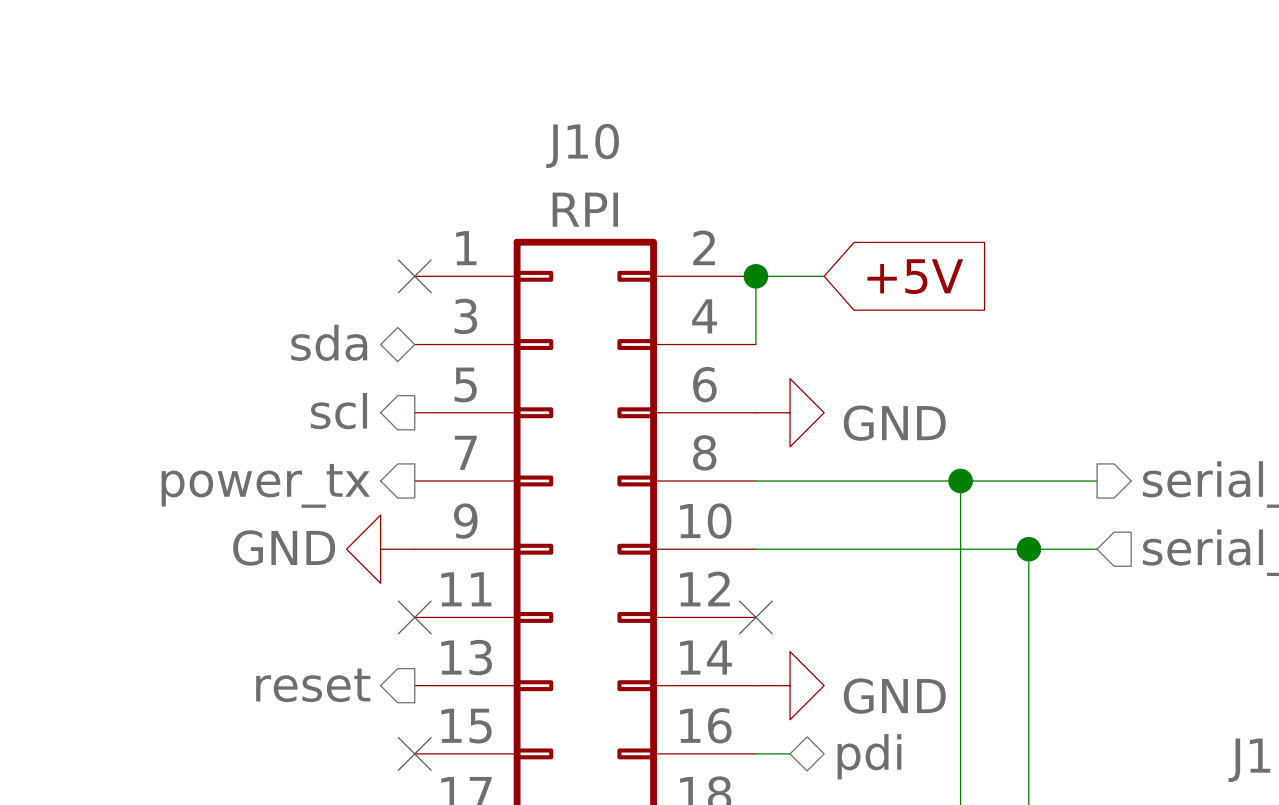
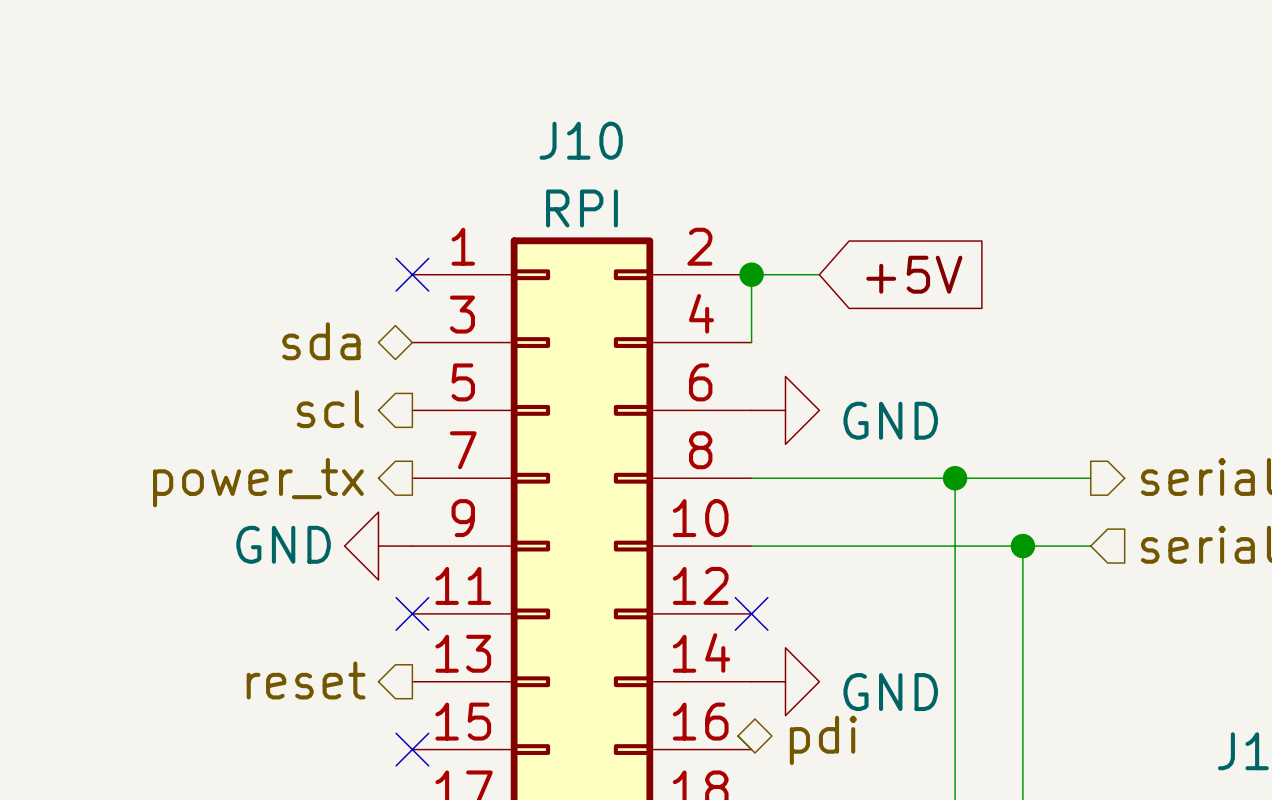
wire: (755, 753) (790, 753) -> (751, 749) (738, 736)
hierarchical label position: pdi (869, 756) -> pdi (823, 740)

